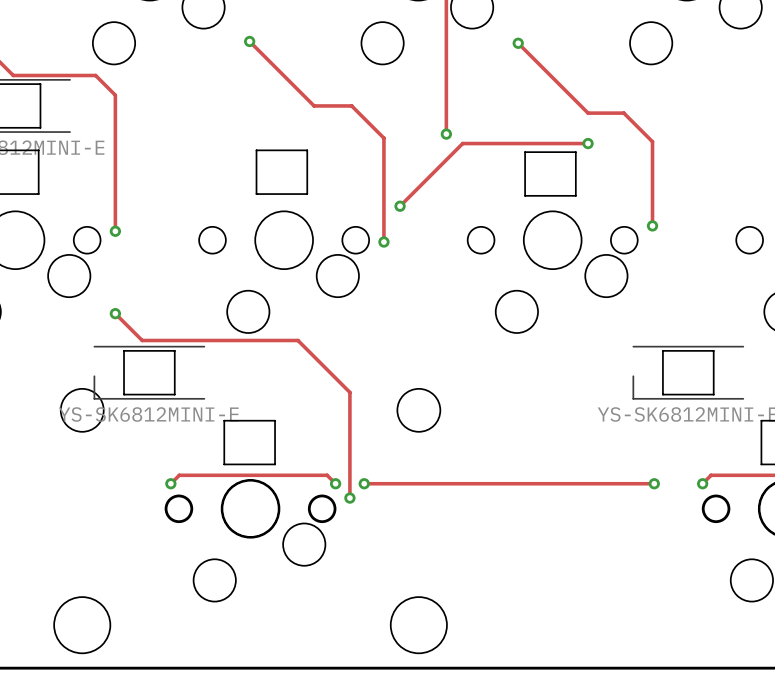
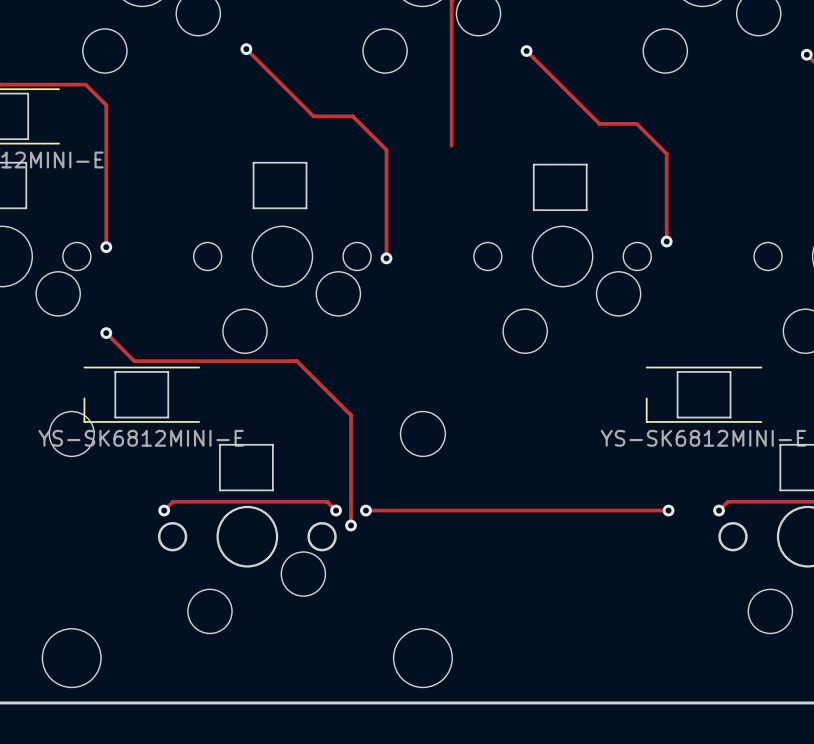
via: (446, 134) -> none
track: (588, 143) (462, 143) (400, 206) -> none
via: (588, 143) -> none
via: (400, 206) -> none

